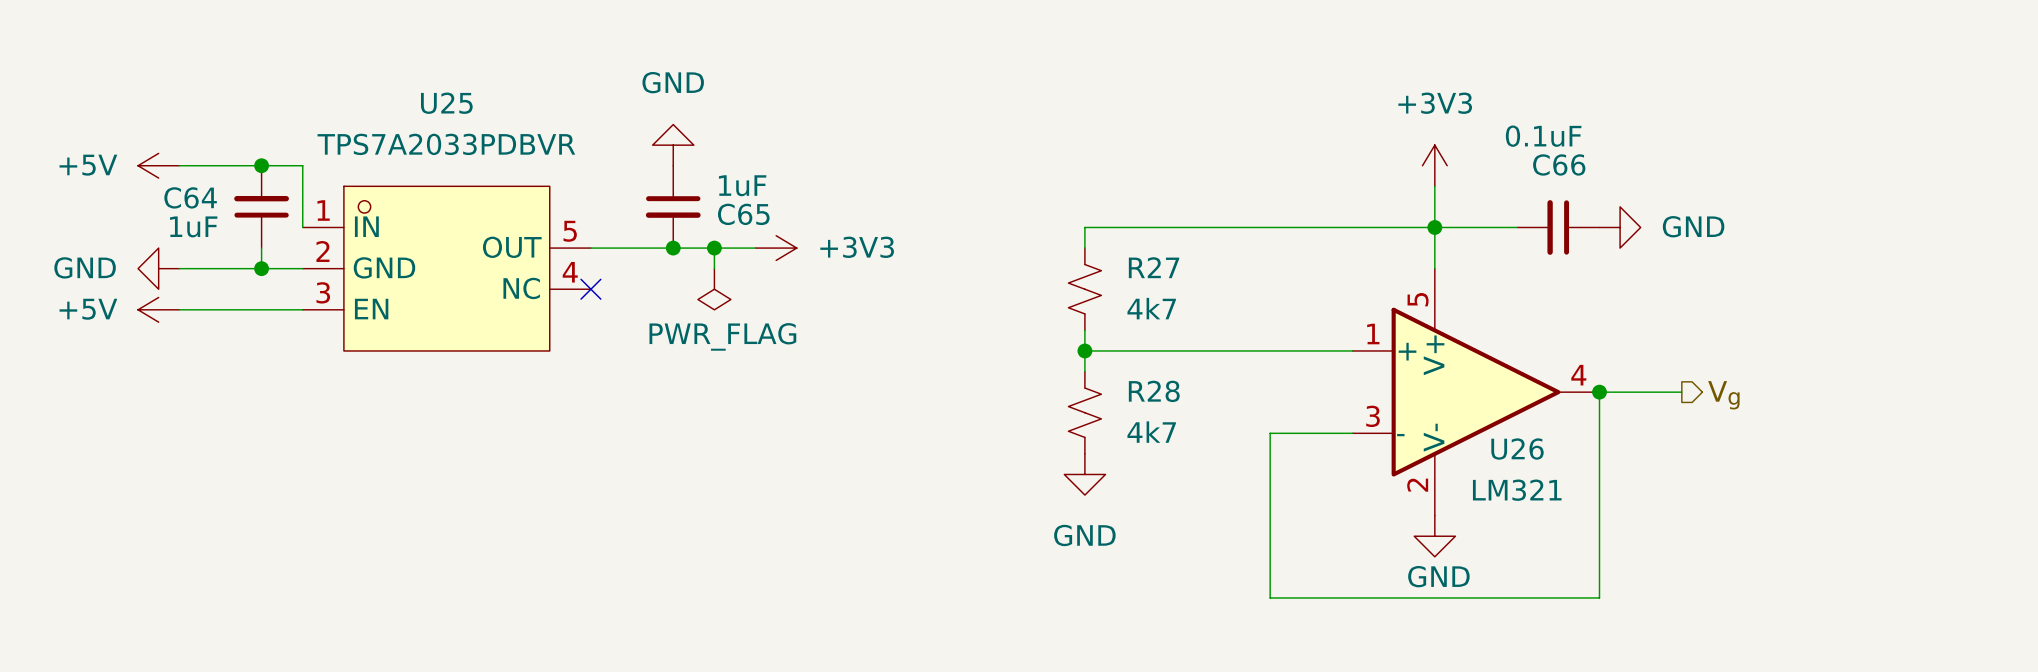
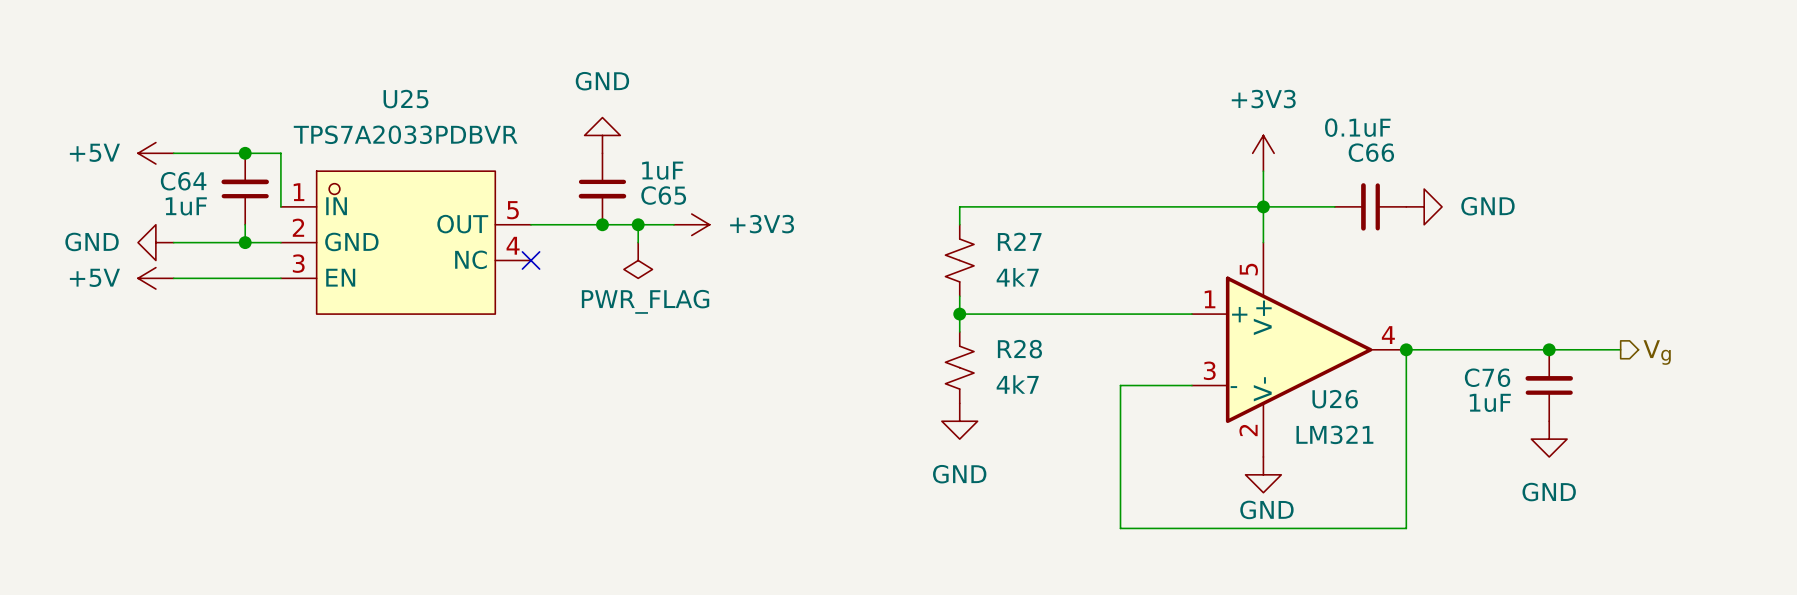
wire: none -> (1477, 349) (1620, 349)
junction: none -> (1549, 349)
hierarchical label position: Vg (1723, 395) -> Vg (1657, 352)
C76: none -> 1uF (1549, 385)
power symbol: none -> GND (1549, 439)

